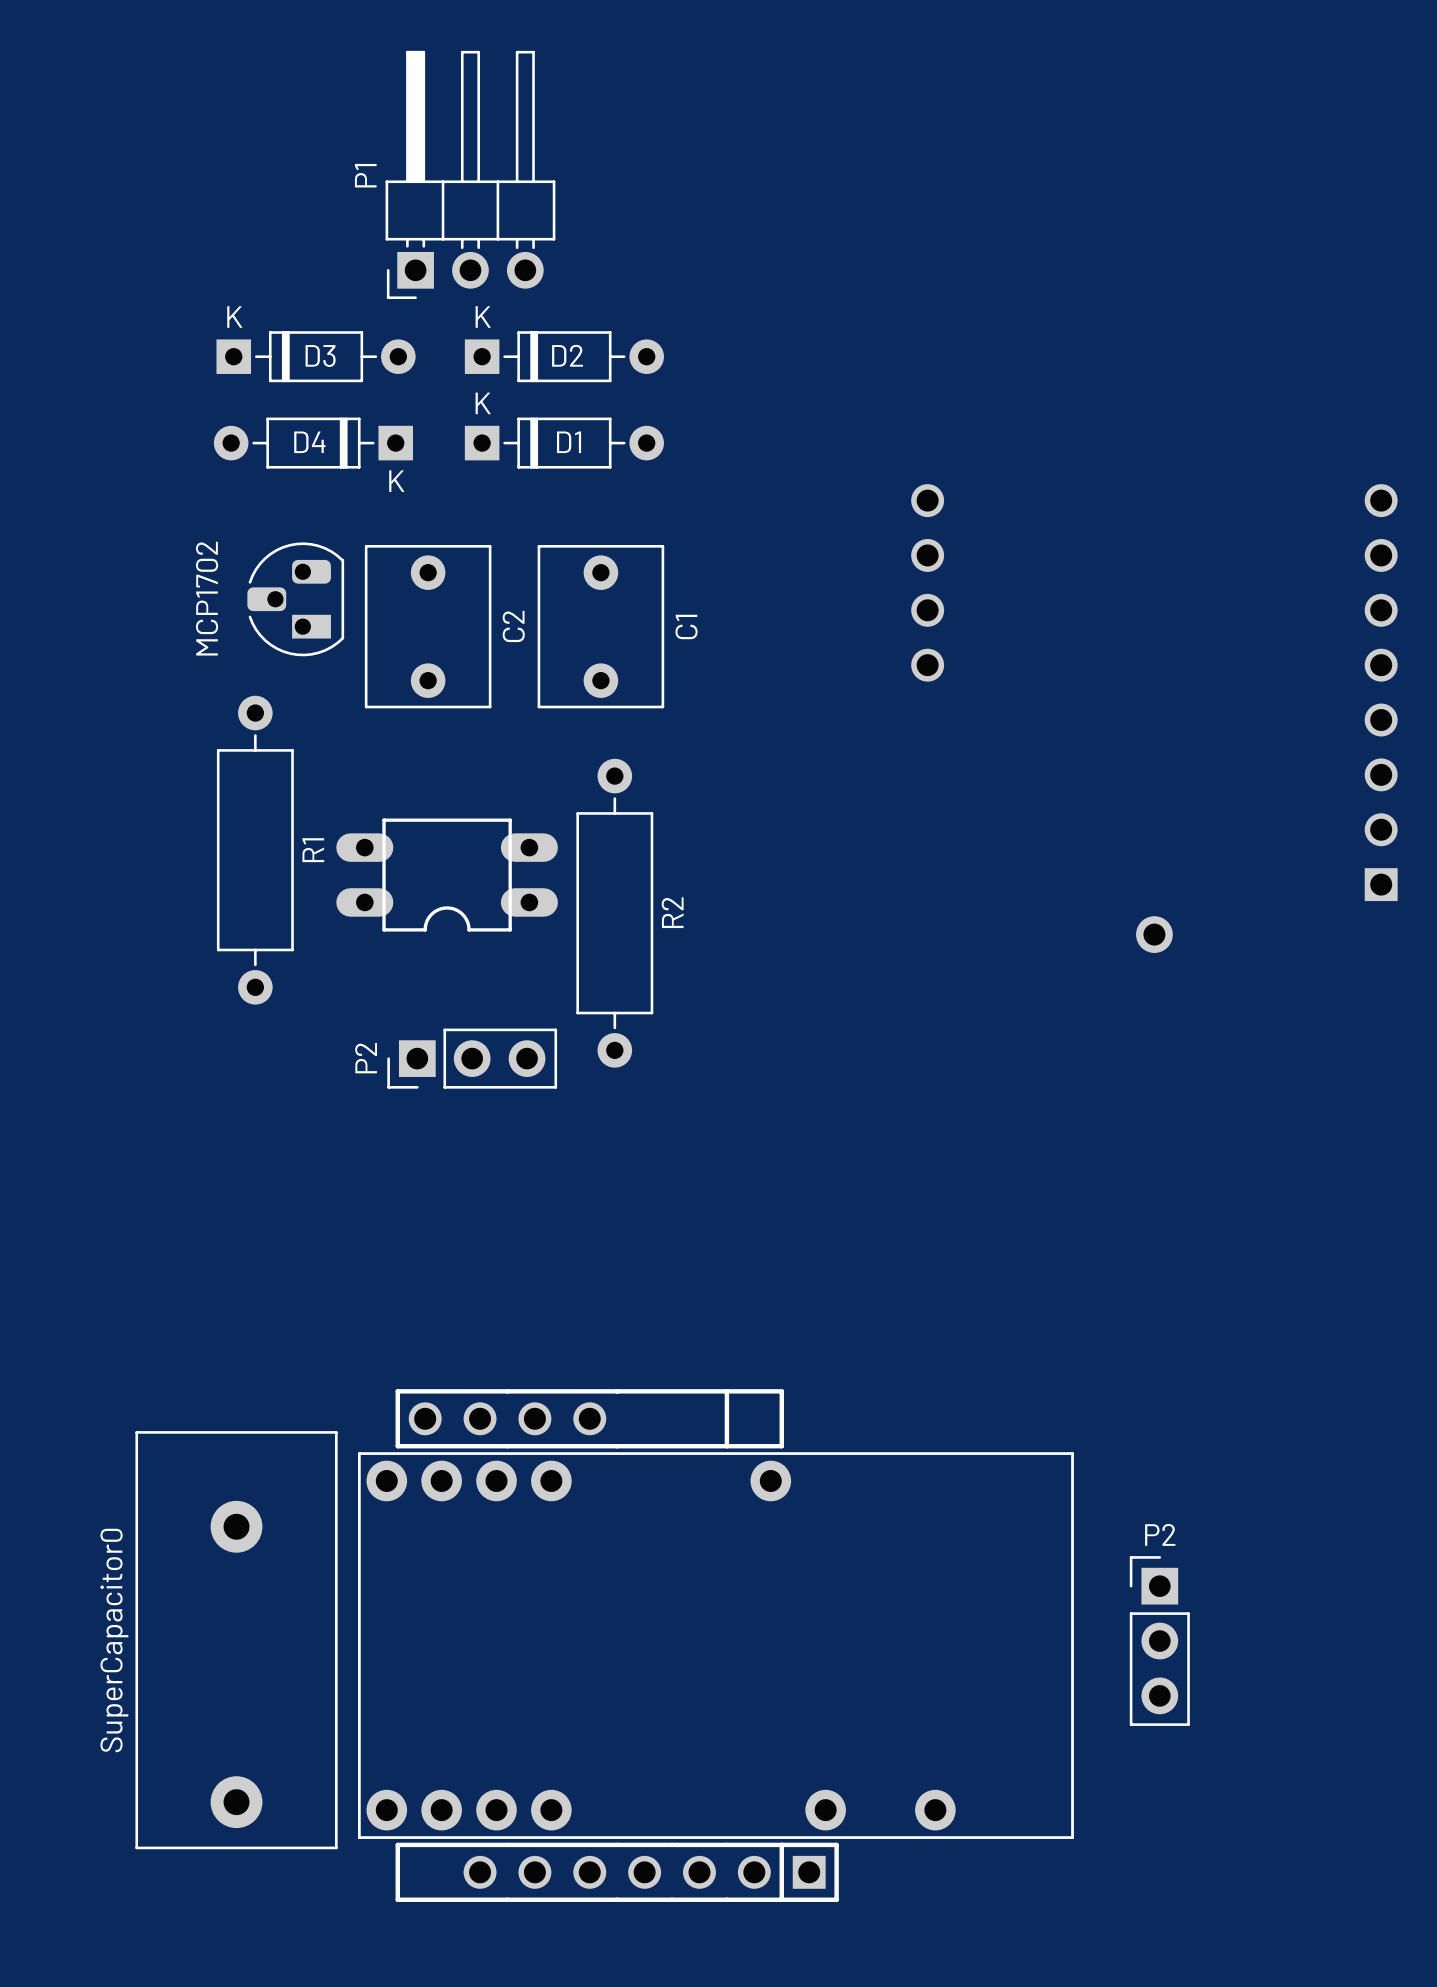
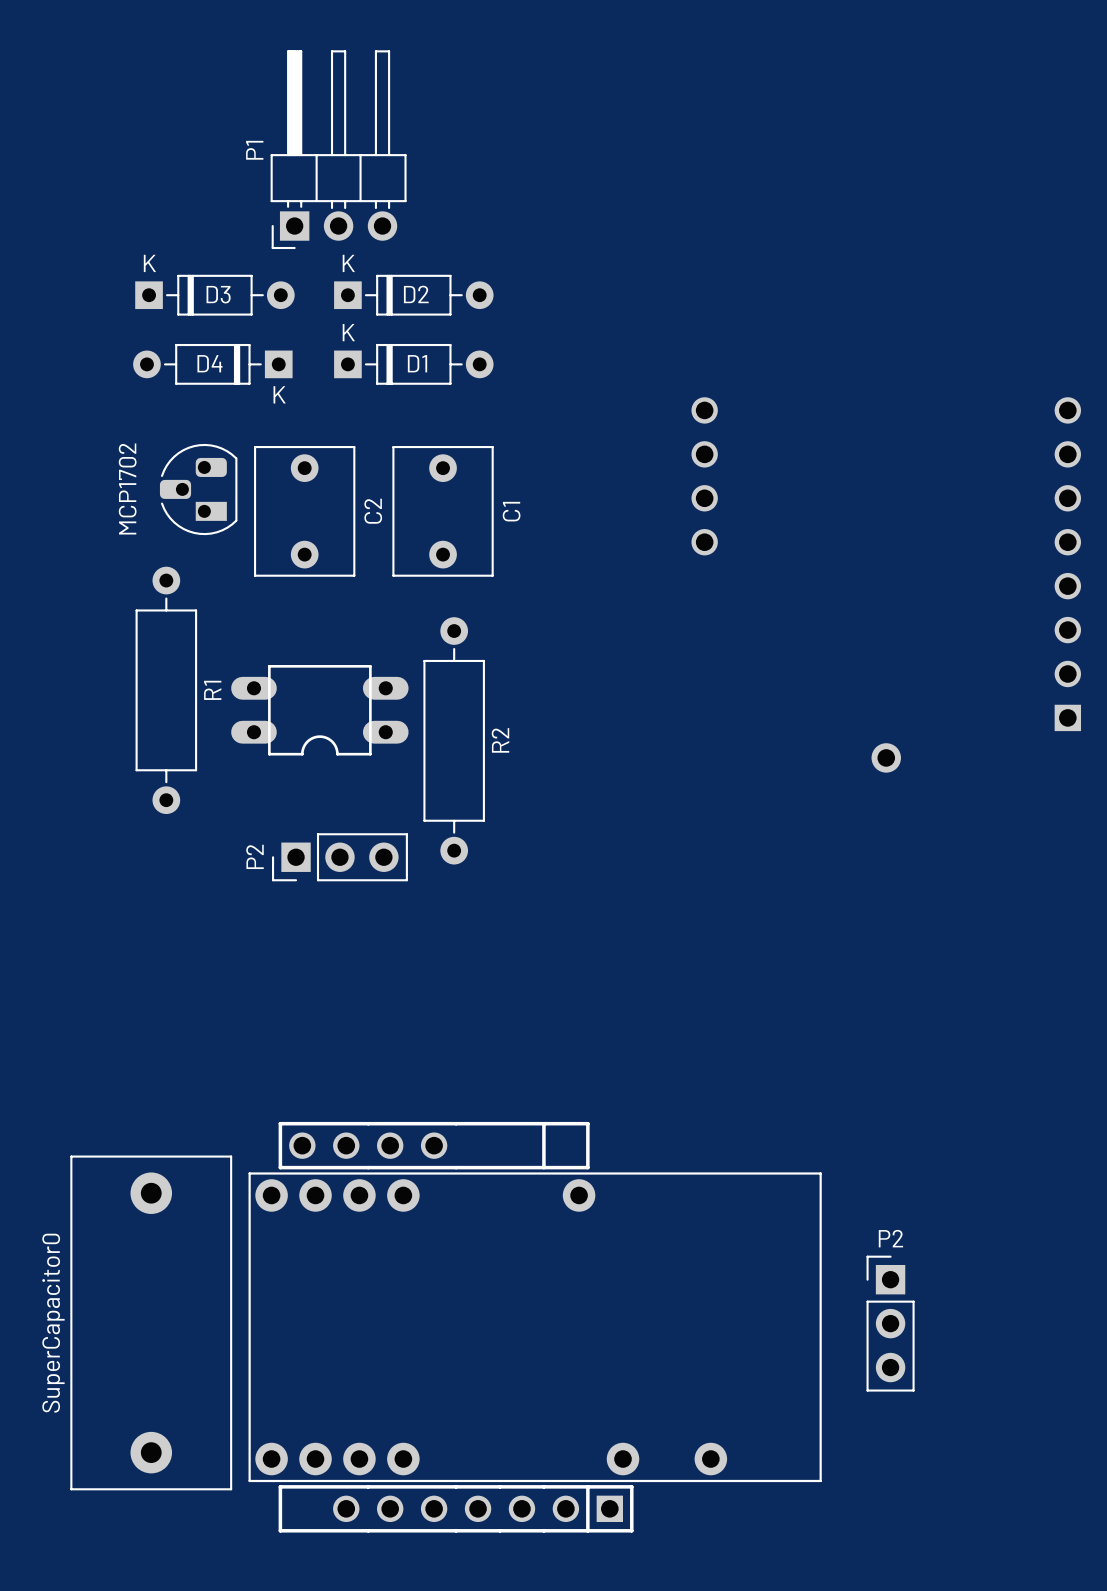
SuperCapacitor0 footprint: [135, 1431, 338, 1850] -> [70, 1155, 233, 1491]

